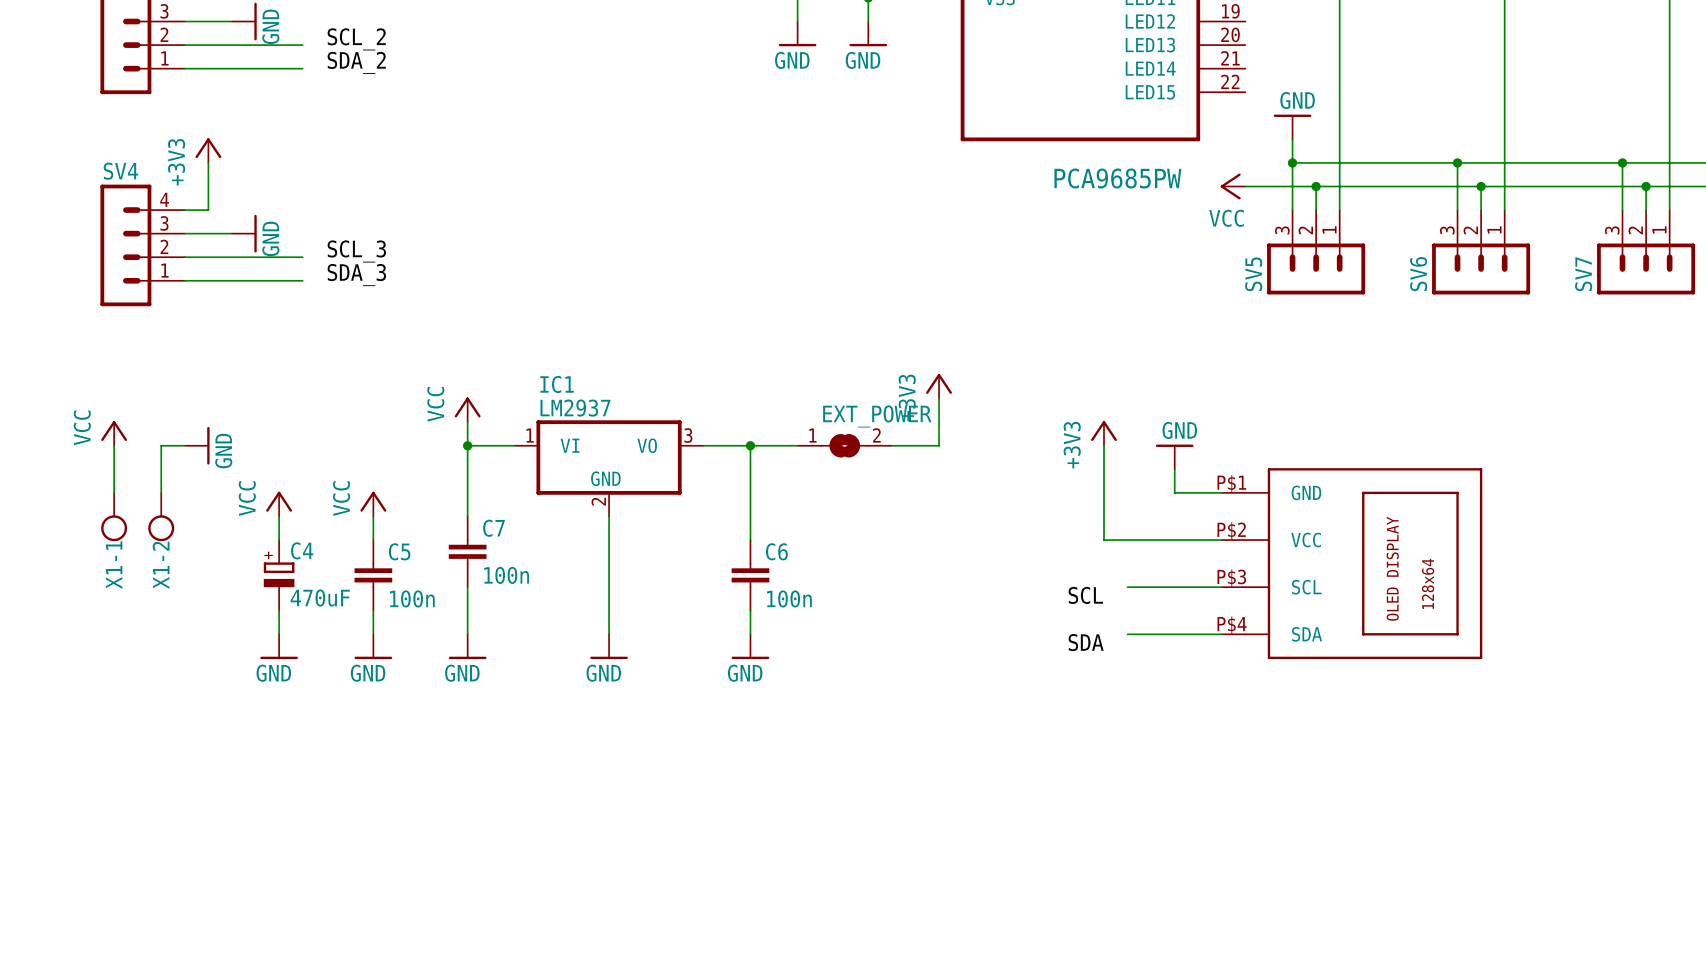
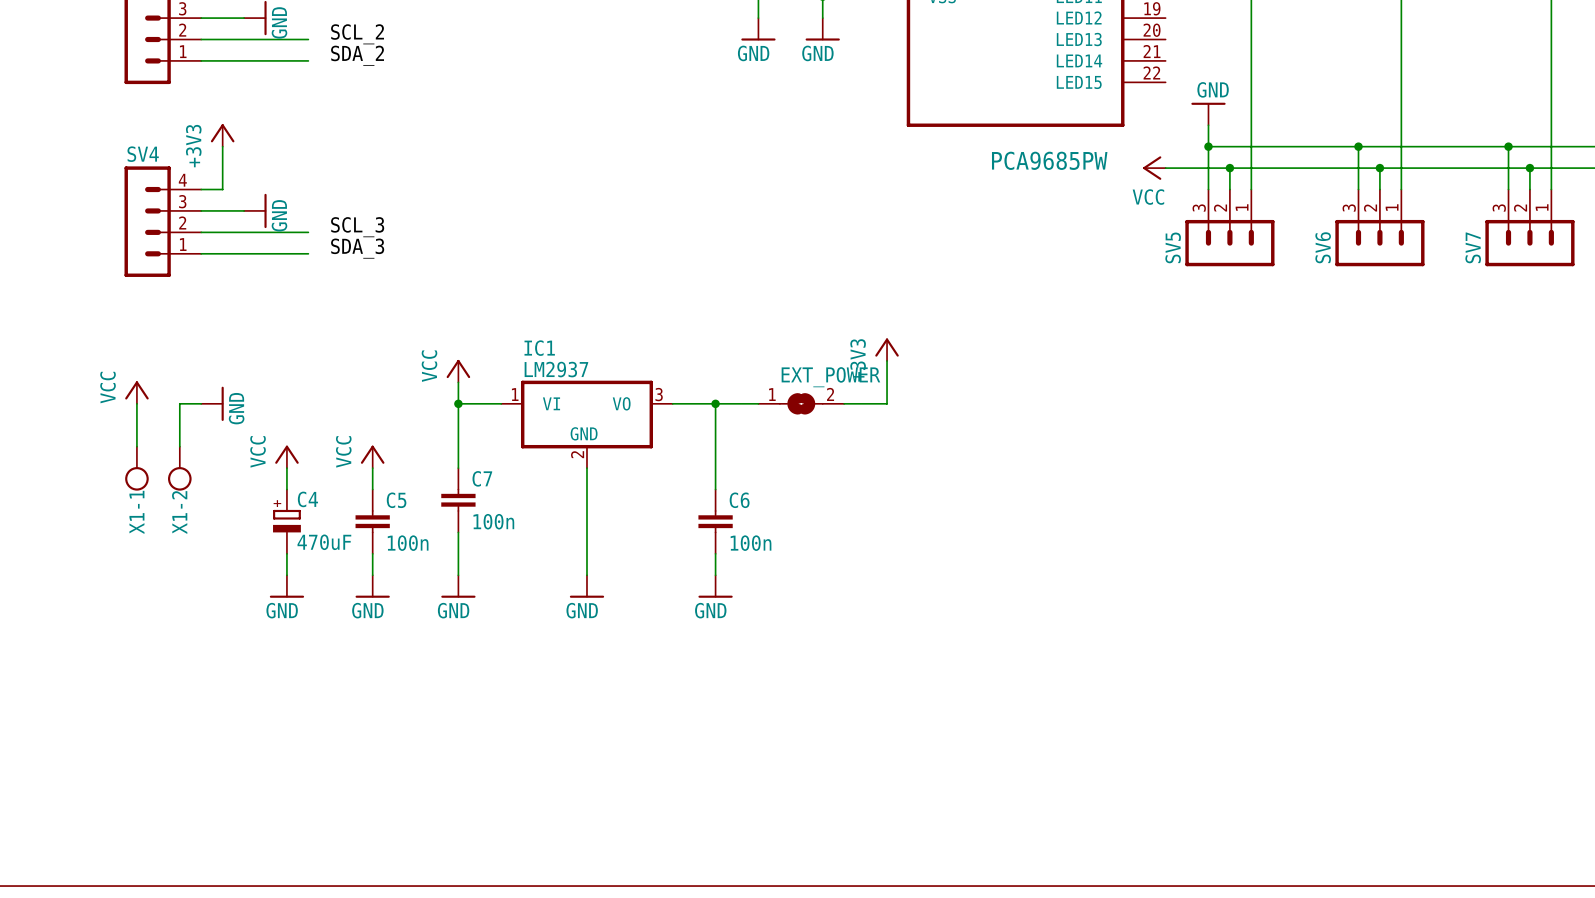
power symbol: +3V3 (1104, 433) -> none
wire: (1104, 445) (1104, 540) (1221, 540) -> none
power symbol: GND (1174, 456) -> none
wire: (1174, 469) (1174, 492) (1221, 492) -> none
part: (1352, 563) -> none
wire: (1127, 587) (1221, 587) -> none
label: SCL (1085, 595) -> none
wire: (1127, 634) (1221, 634) -> none
label: SDA (1086, 642) -> none

